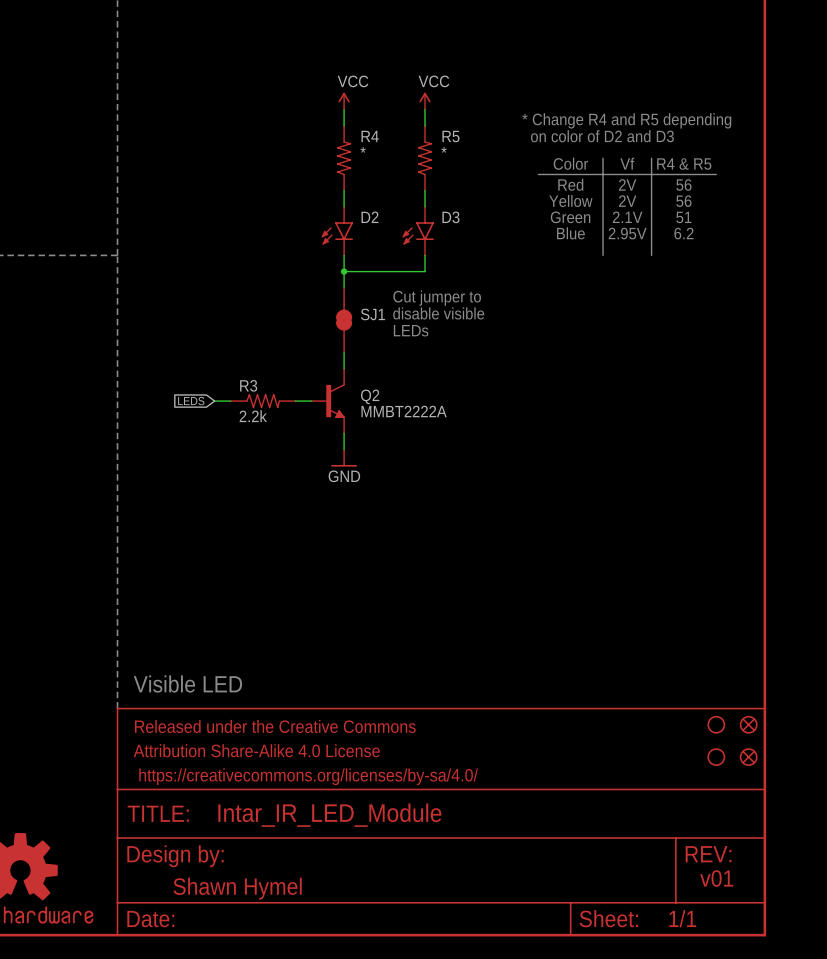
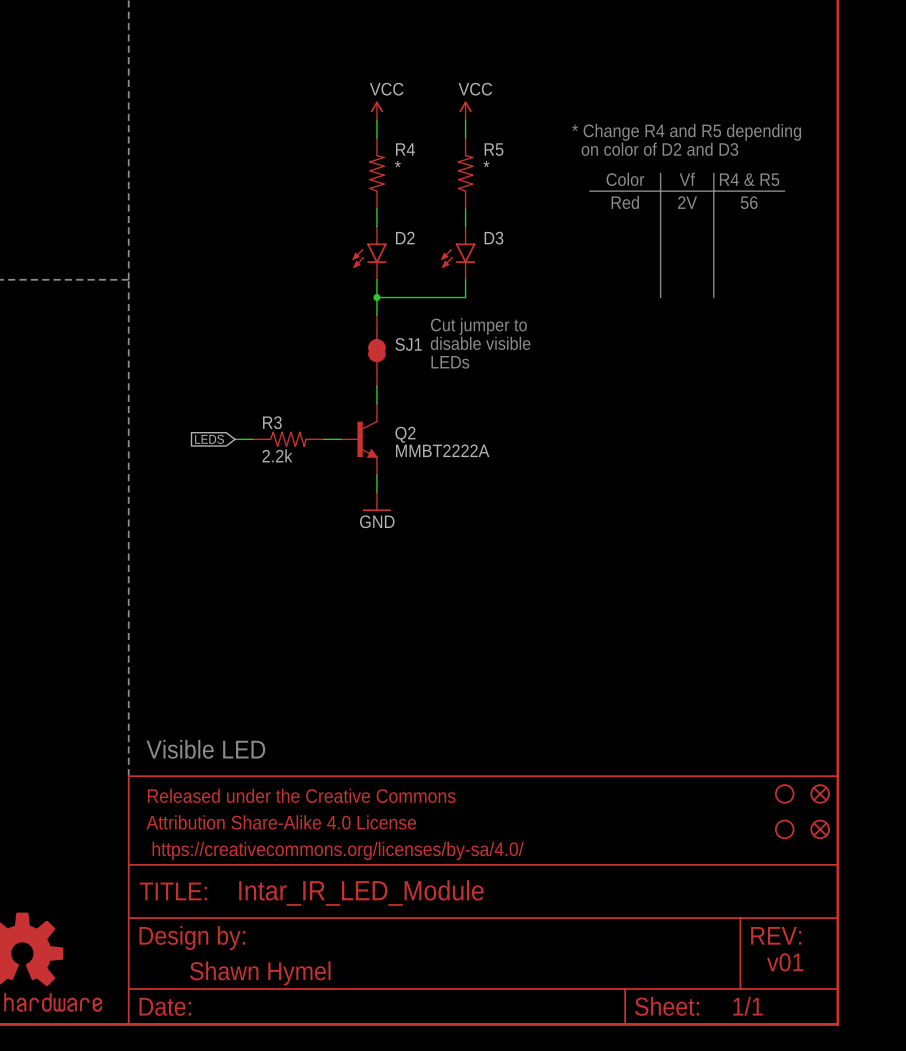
text: Yellow (570, 200) -> none
text: 2V (627, 201) -> none
text: 56 (683, 201) -> none
text: Green (570, 217) -> none
text: 2.1V (627, 217) -> none
text: 51 (683, 217) -> none
text: Blue (570, 233) -> none
text: 2.95V (627, 233) -> none
text: 6.2 (683, 233) -> none
line: none -> (660, 279) (660, 297)
line: none -> (713, 279) (713, 297)

